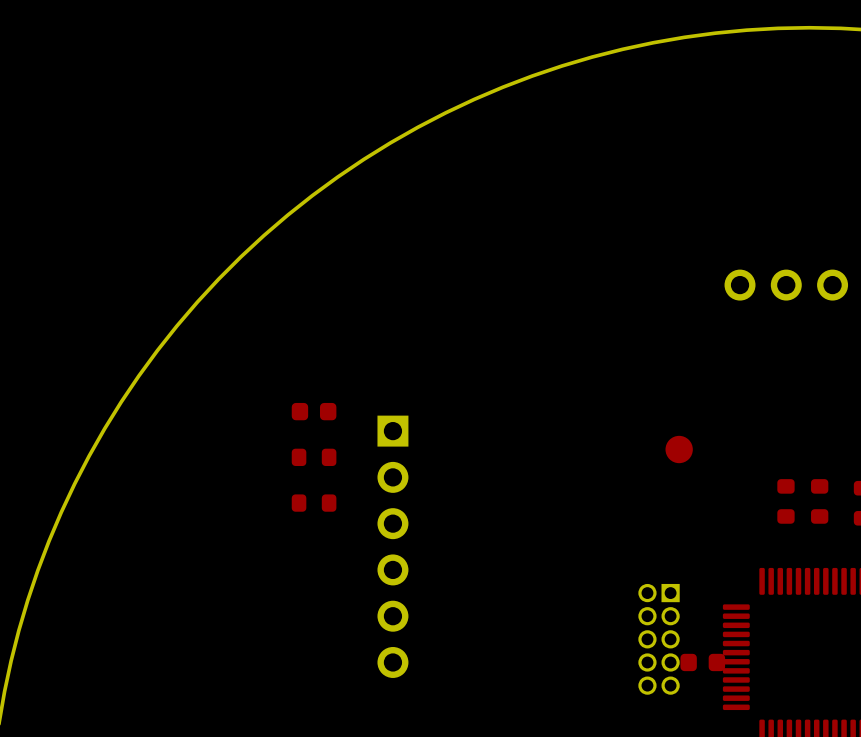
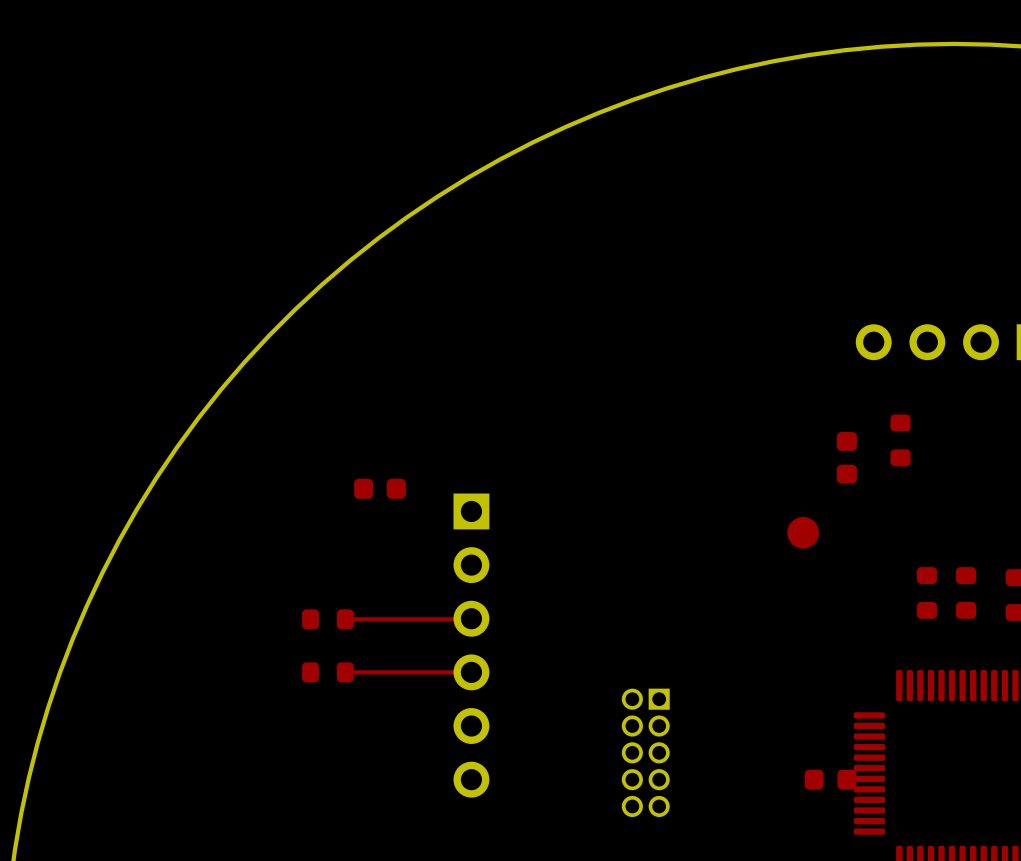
part: none -> (900, 440)
part: none -> (846, 457)
part: (314, 457) -> none
part: (314, 503) -> none
top track: none -> (471, 618) (345, 619)
part: none -> (327, 619)
part: none -> (327, 672)
top track: none -> (471, 672) (345, 672)
part position: (659, 639) -> (645, 752)

